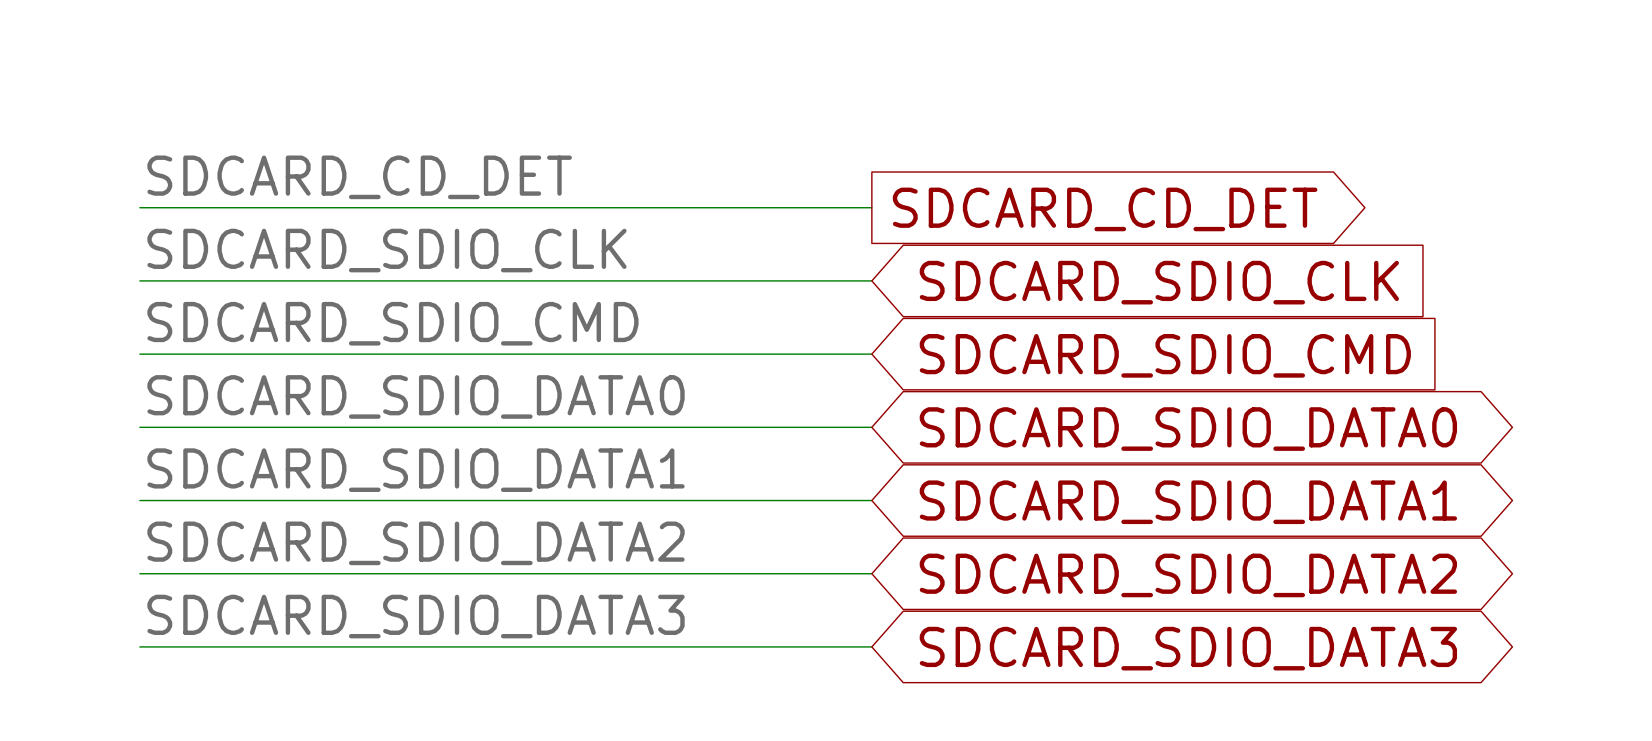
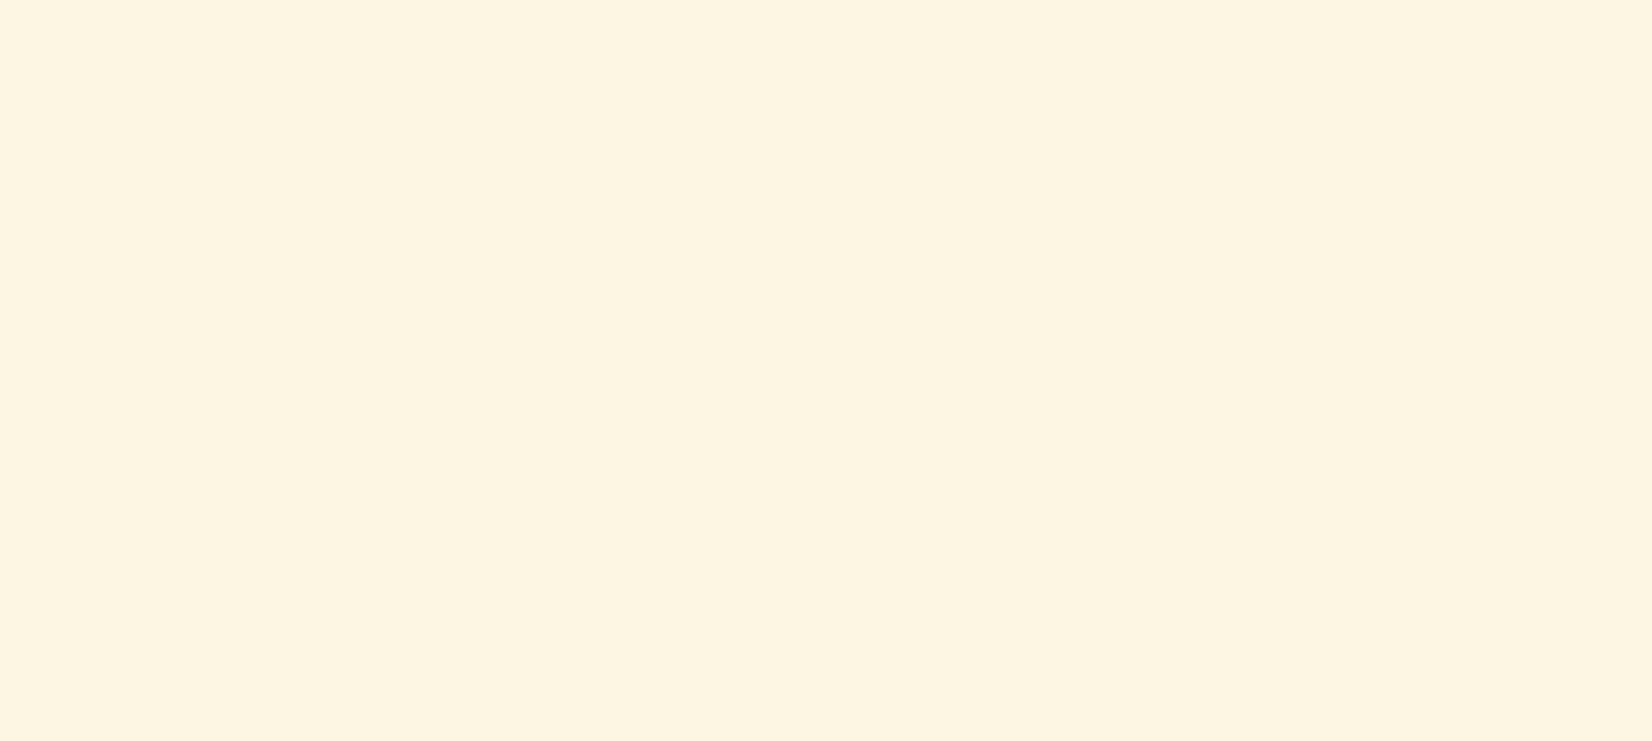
label: SDCARD_CD_DET (359, 177) -> none
wire: (139, 207) (871, 207) -> none
global label: SDCARD_CD_DET (1105, 209) -> none
label: SDCARD_SDIO_CLK (386, 250) -> none
wire: (139, 280) (871, 280) -> none
global label: SDCARD_SDIO_CLK (1159, 282) -> none
label: SDCARD_SDIO_CMD (392, 323) -> none
wire: (139, 354) (871, 354) -> none
global label: SDCARD_SDIO_CMD (1165, 355) -> none
label: SDCARD_SDIO_DATA0 (416, 396) -> none
wire: (139, 427) (871, 427) -> none
global label: SDCARD_SDIO_DATA0 (1188, 429) -> none
label: SDCARD_SDIO_DATA1 (416, 470) -> none
wire: (139, 500) (871, 500) -> none
global label: SDCARD_SDIO_DATA1 (1188, 502) -> none
label: SDCARD_SDIO_DATA2 (416, 543) -> none
wire: (139, 573) (871, 573) -> none
global label: SDCARD_SDIO_DATA2 (1188, 575) -> none
label: SDCARD_SDIO_DATA3 (416, 616) -> none
wire: (139, 646) (871, 646) -> none
global label: SDCARD_SDIO_DATA3 (1188, 648) -> none

